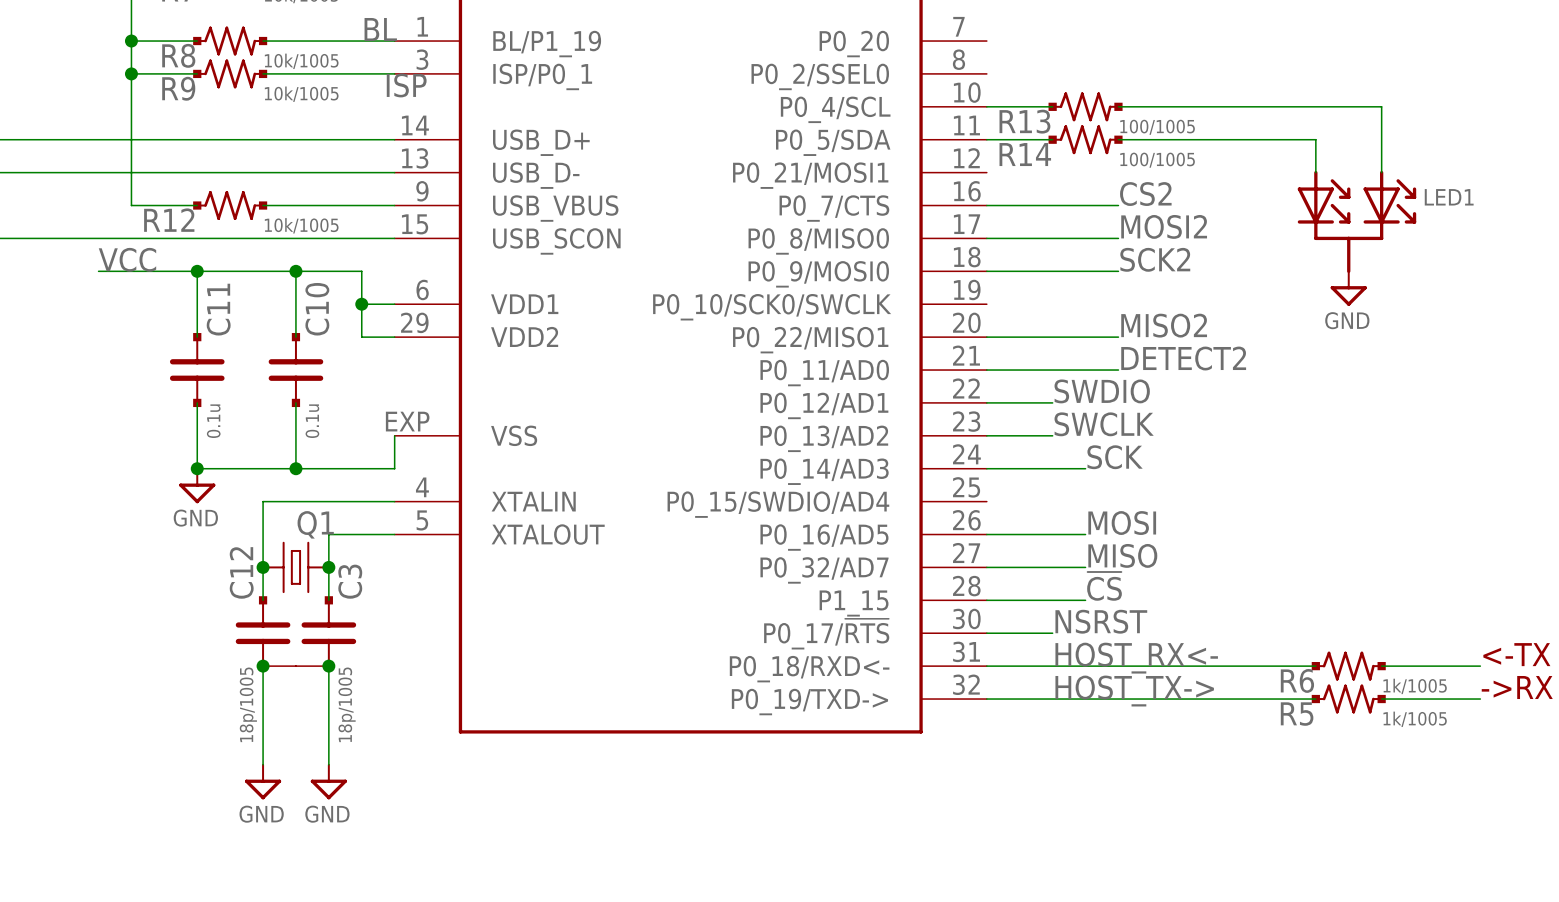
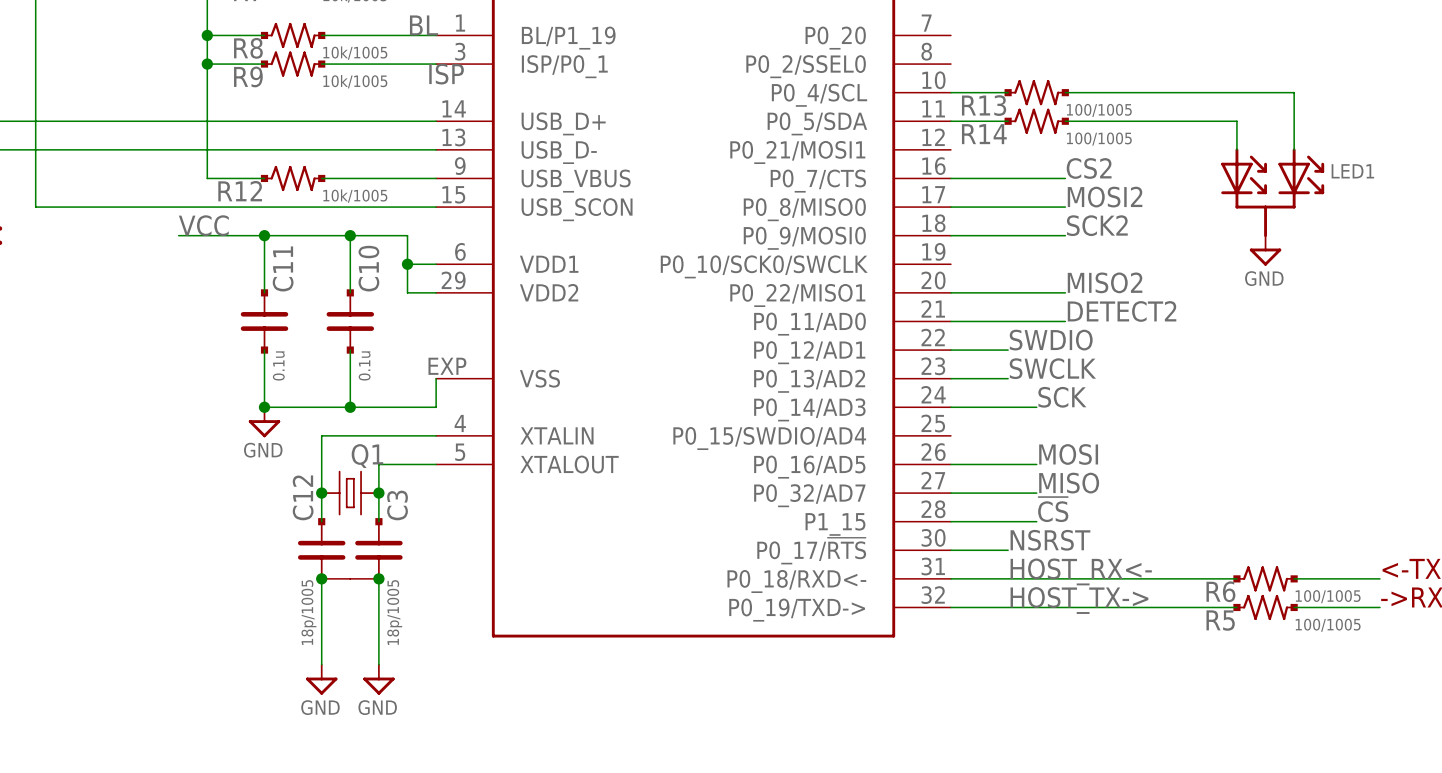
R6 value: 1k/1005 (1415, 686) -> 100/1005 (1328, 596)
R5 value: 1k/1005 (1415, 719) -> 100/1005 (1328, 625)

